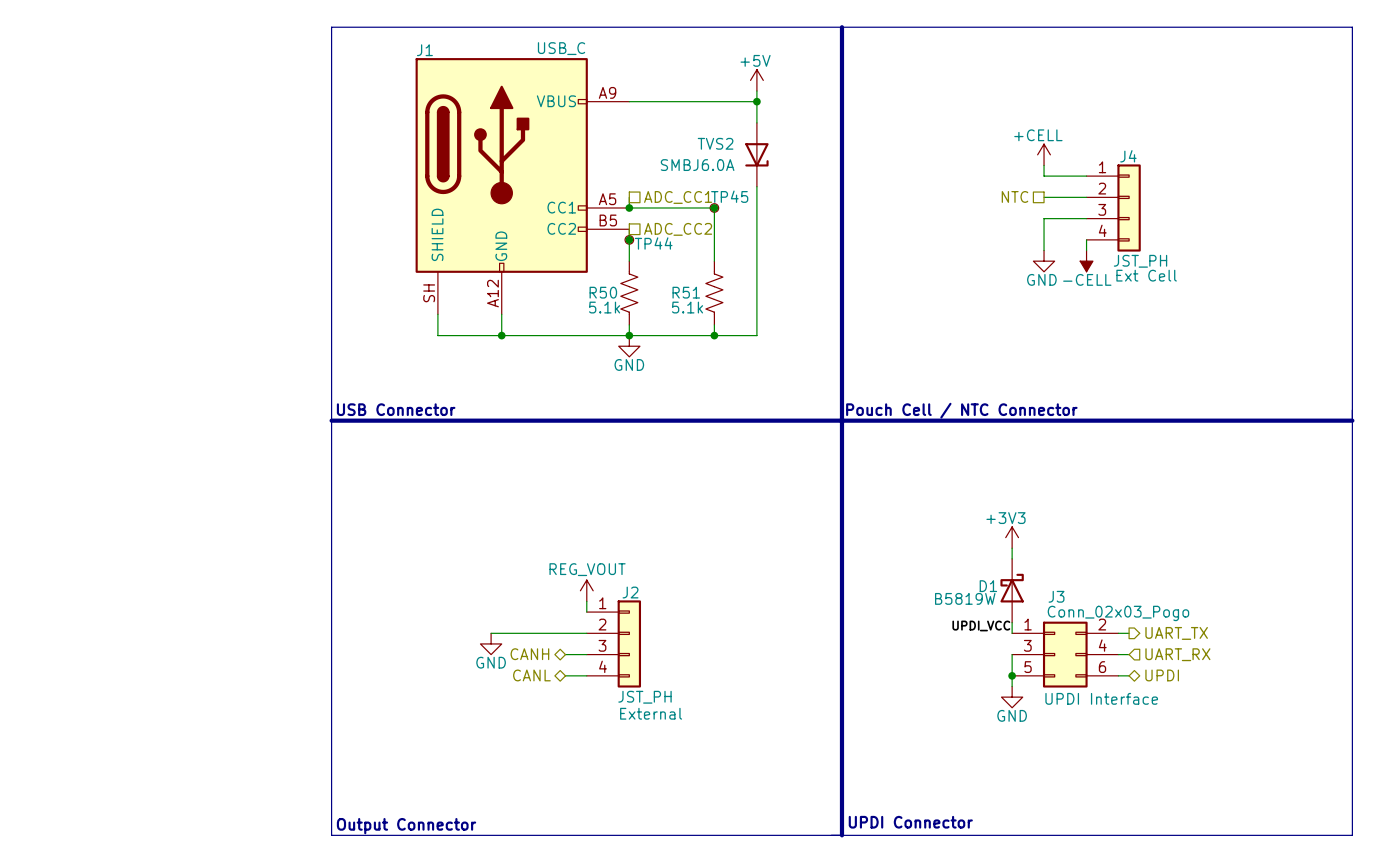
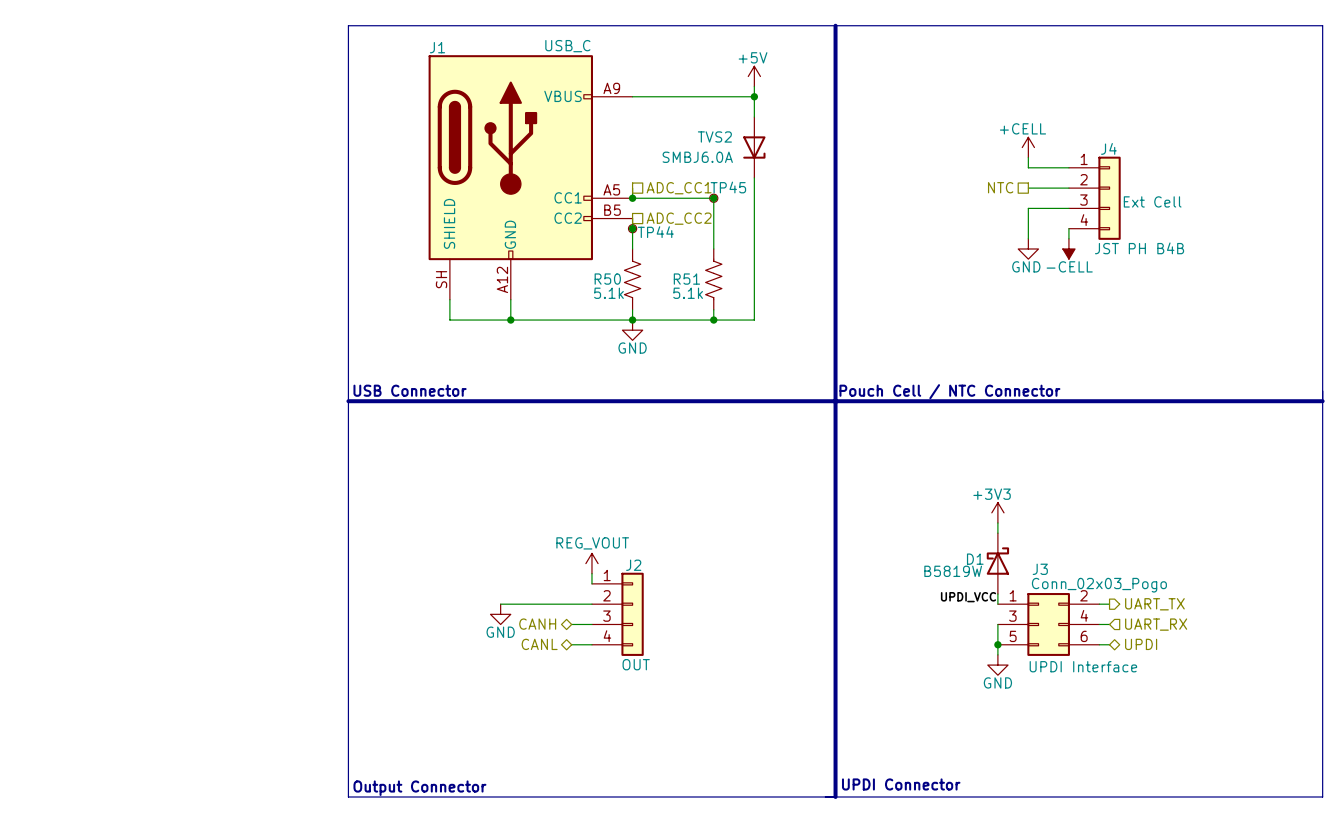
J4 value: JST_PH (1140, 261) -> JST PH B4B (1139, 248)
J4 text position: Ext Cell (1146, 275) -> Ext Cell (1152, 201)
J2 value: JST_PH (644, 697) -> OUT (636, 664)
J2 text: External (651, 713) -> none

